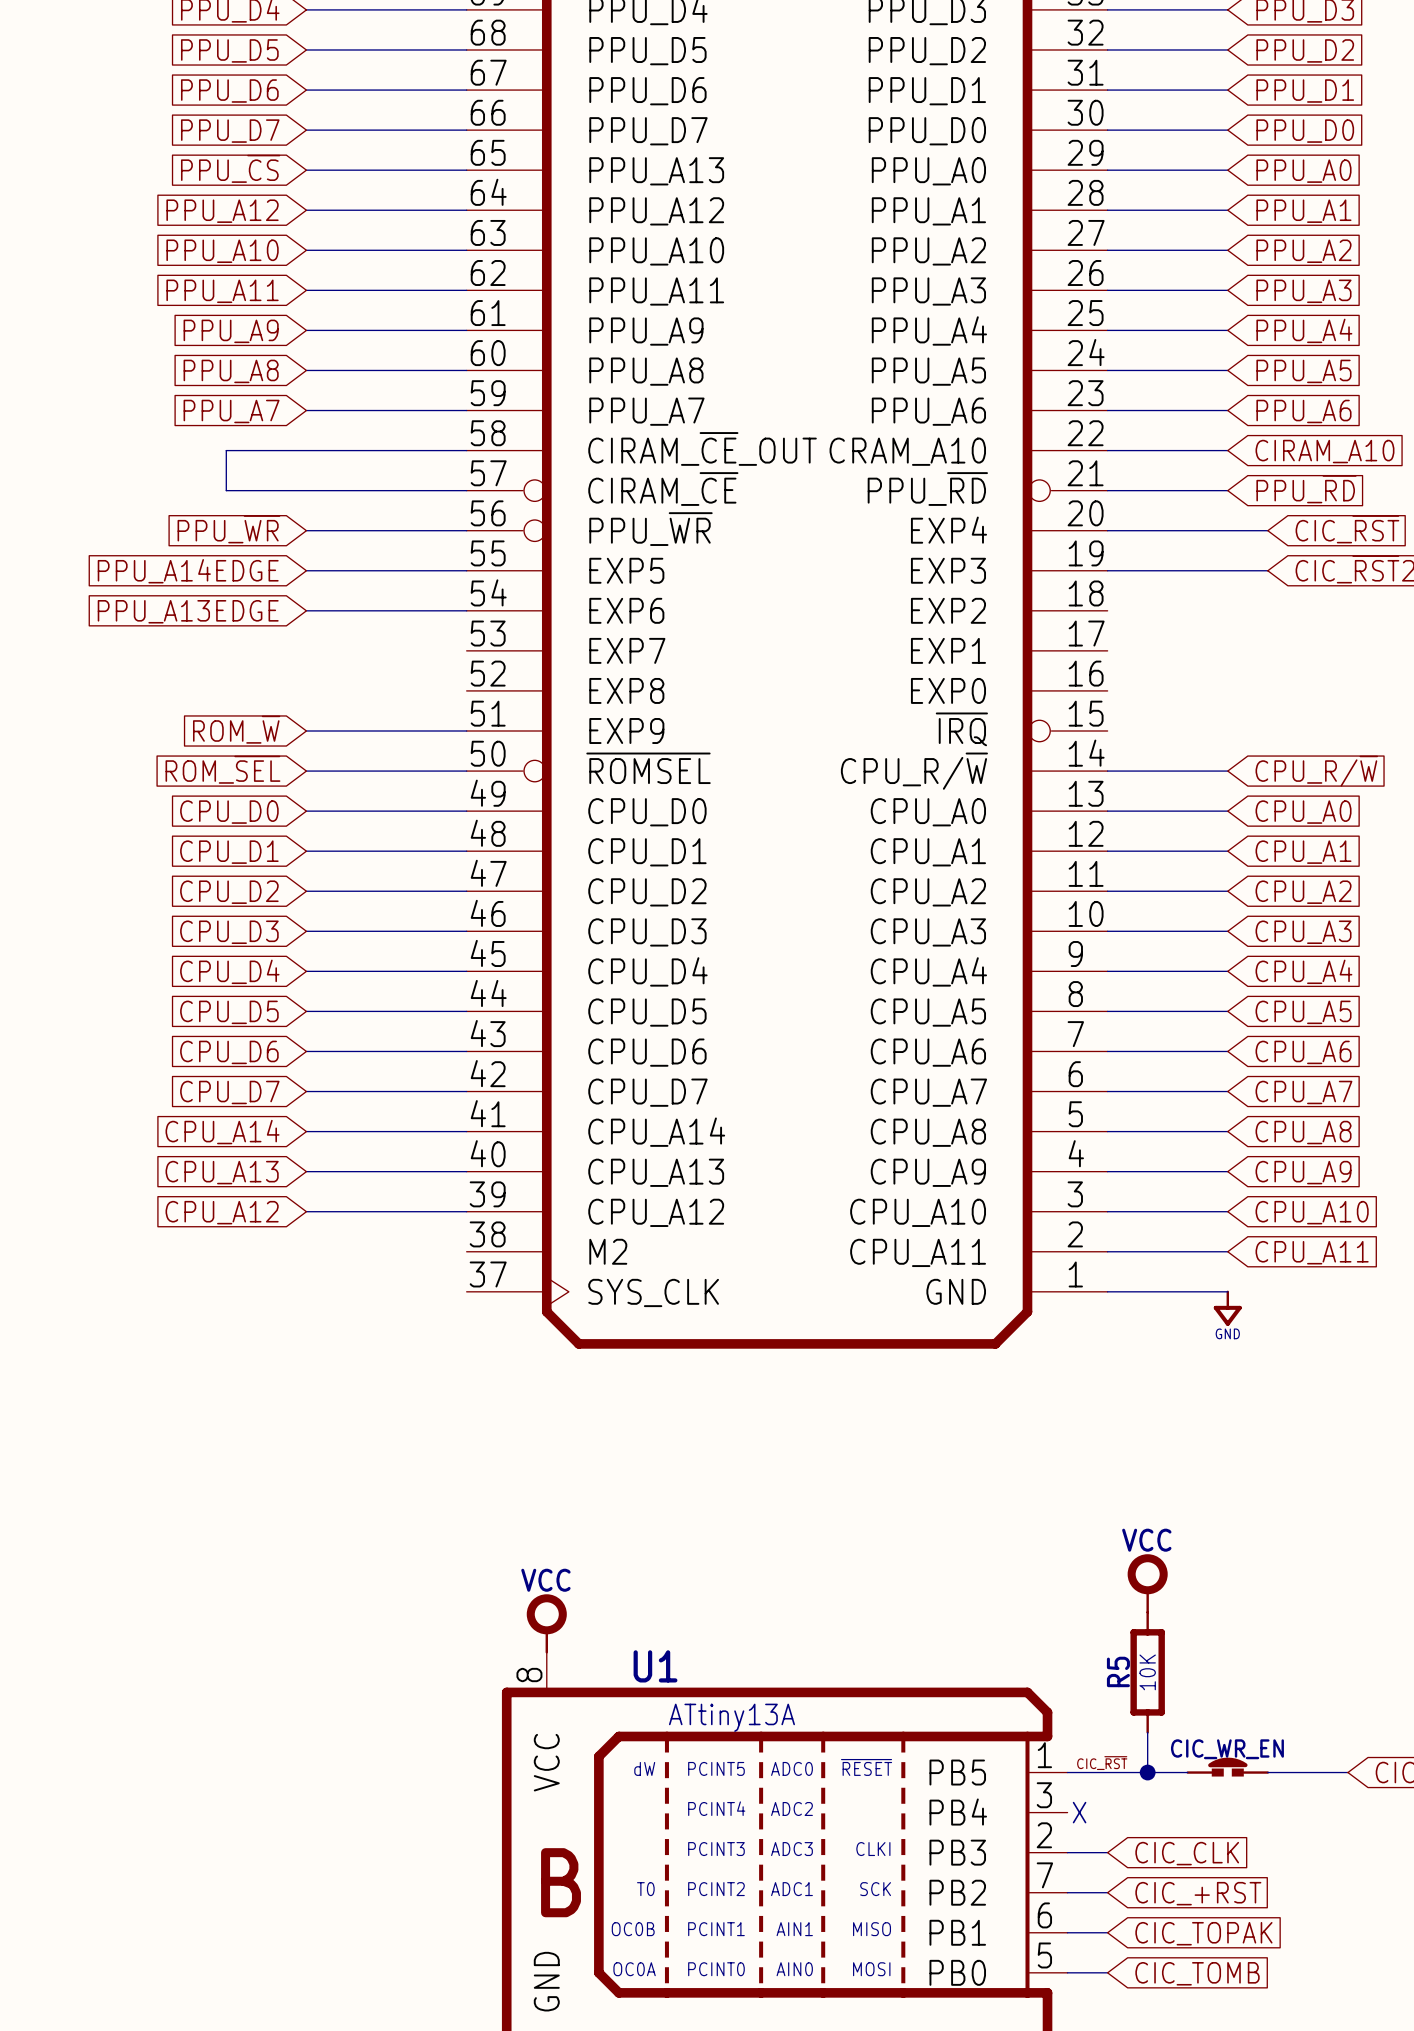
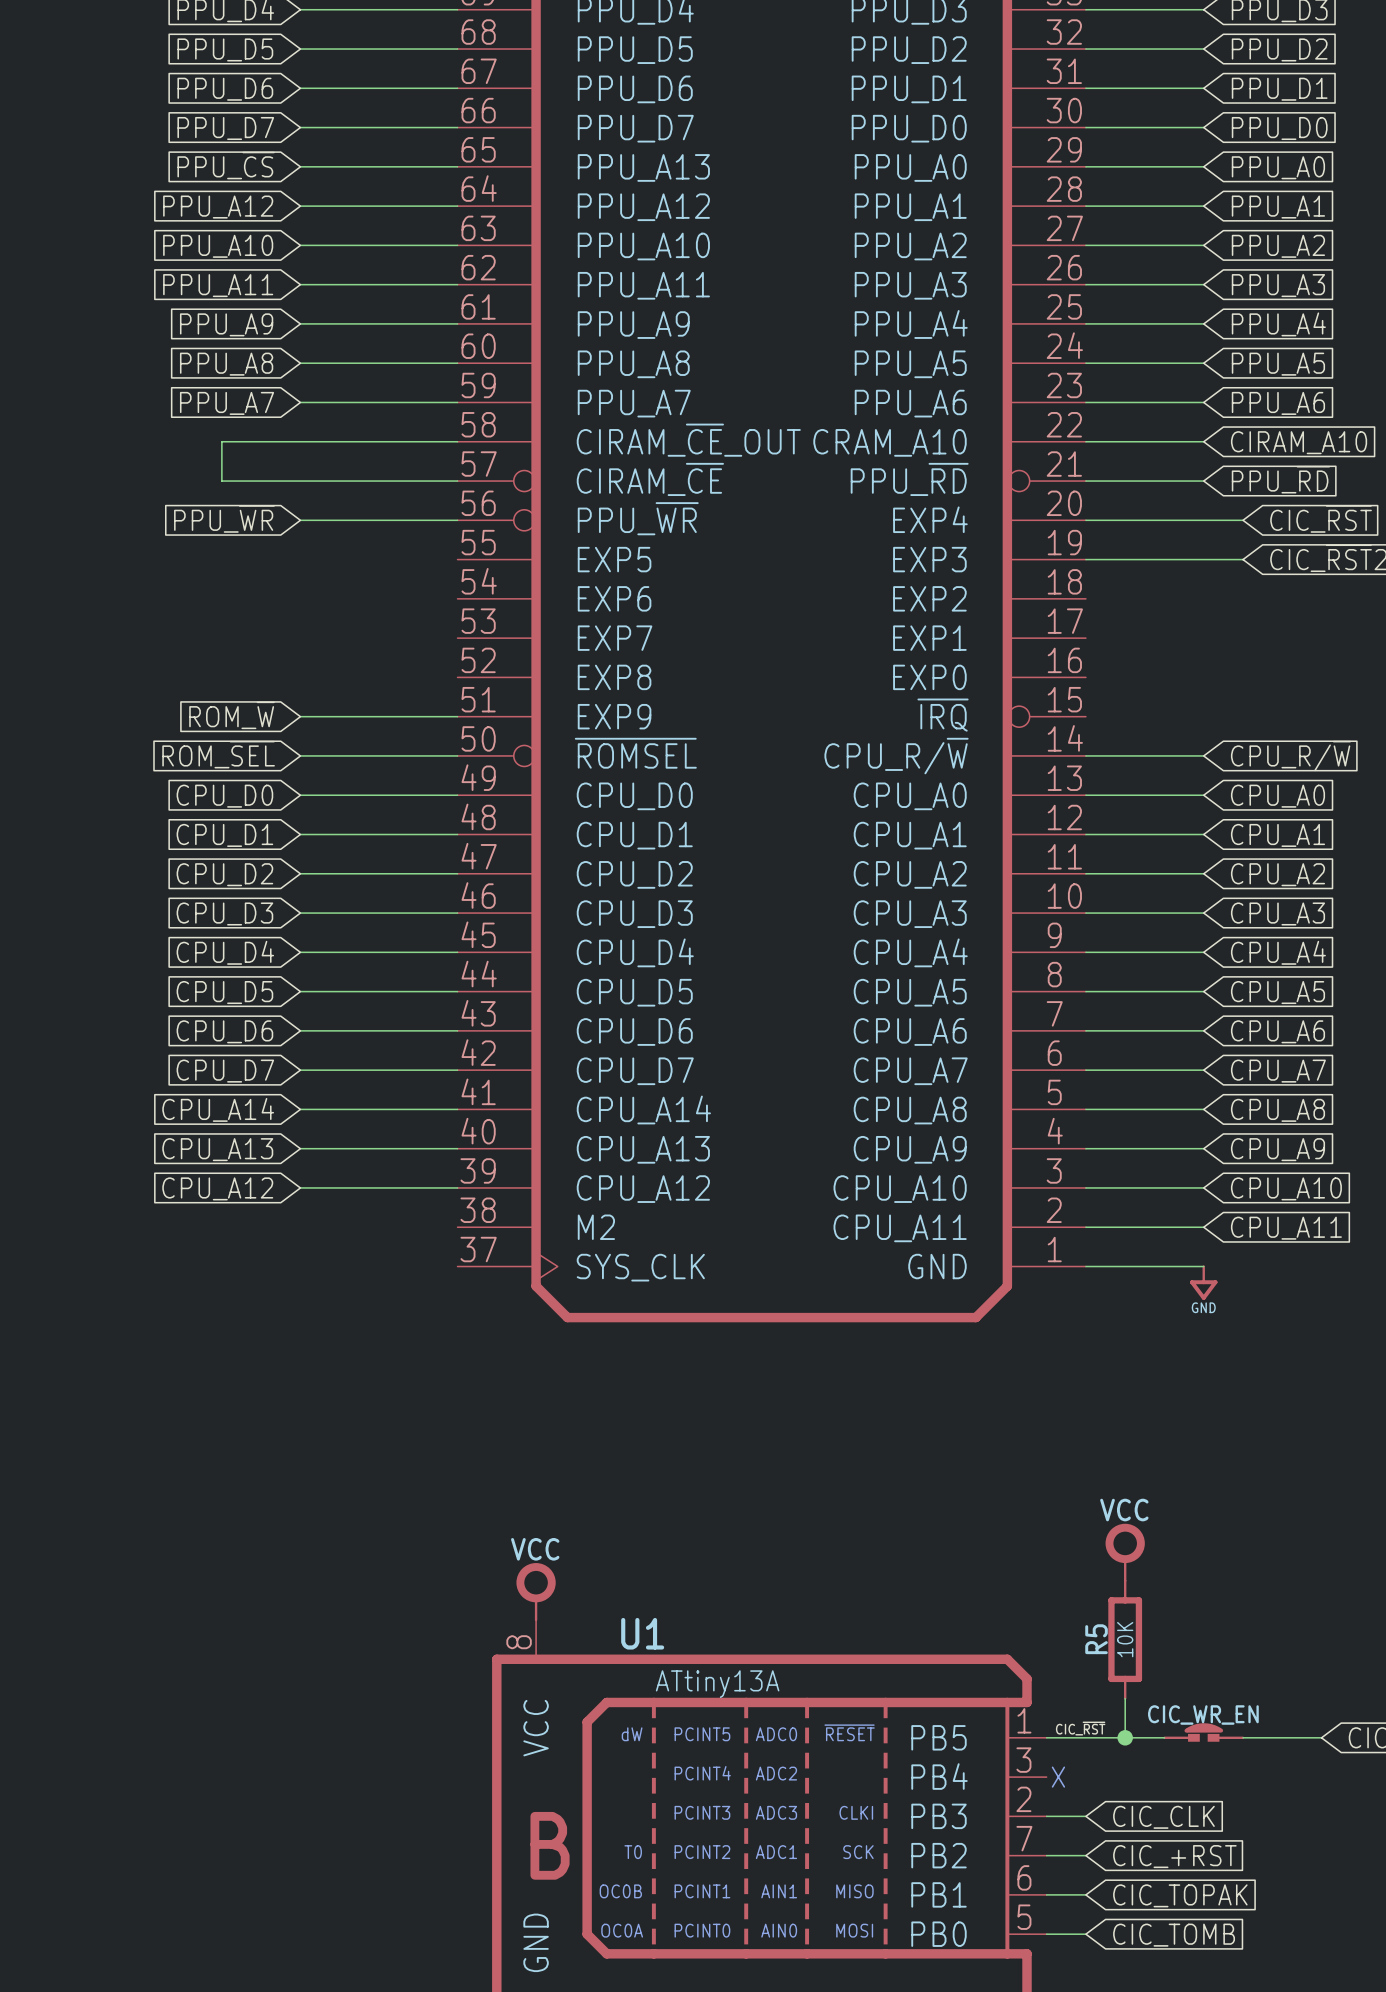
wire: (306, 570) (466, 570) -> none
global label: PPU_A14EDGE (188, 571) -> none
wire: (306, 610) (466, 610) -> none
global label: PPU_A13EDGE (188, 611) -> none

